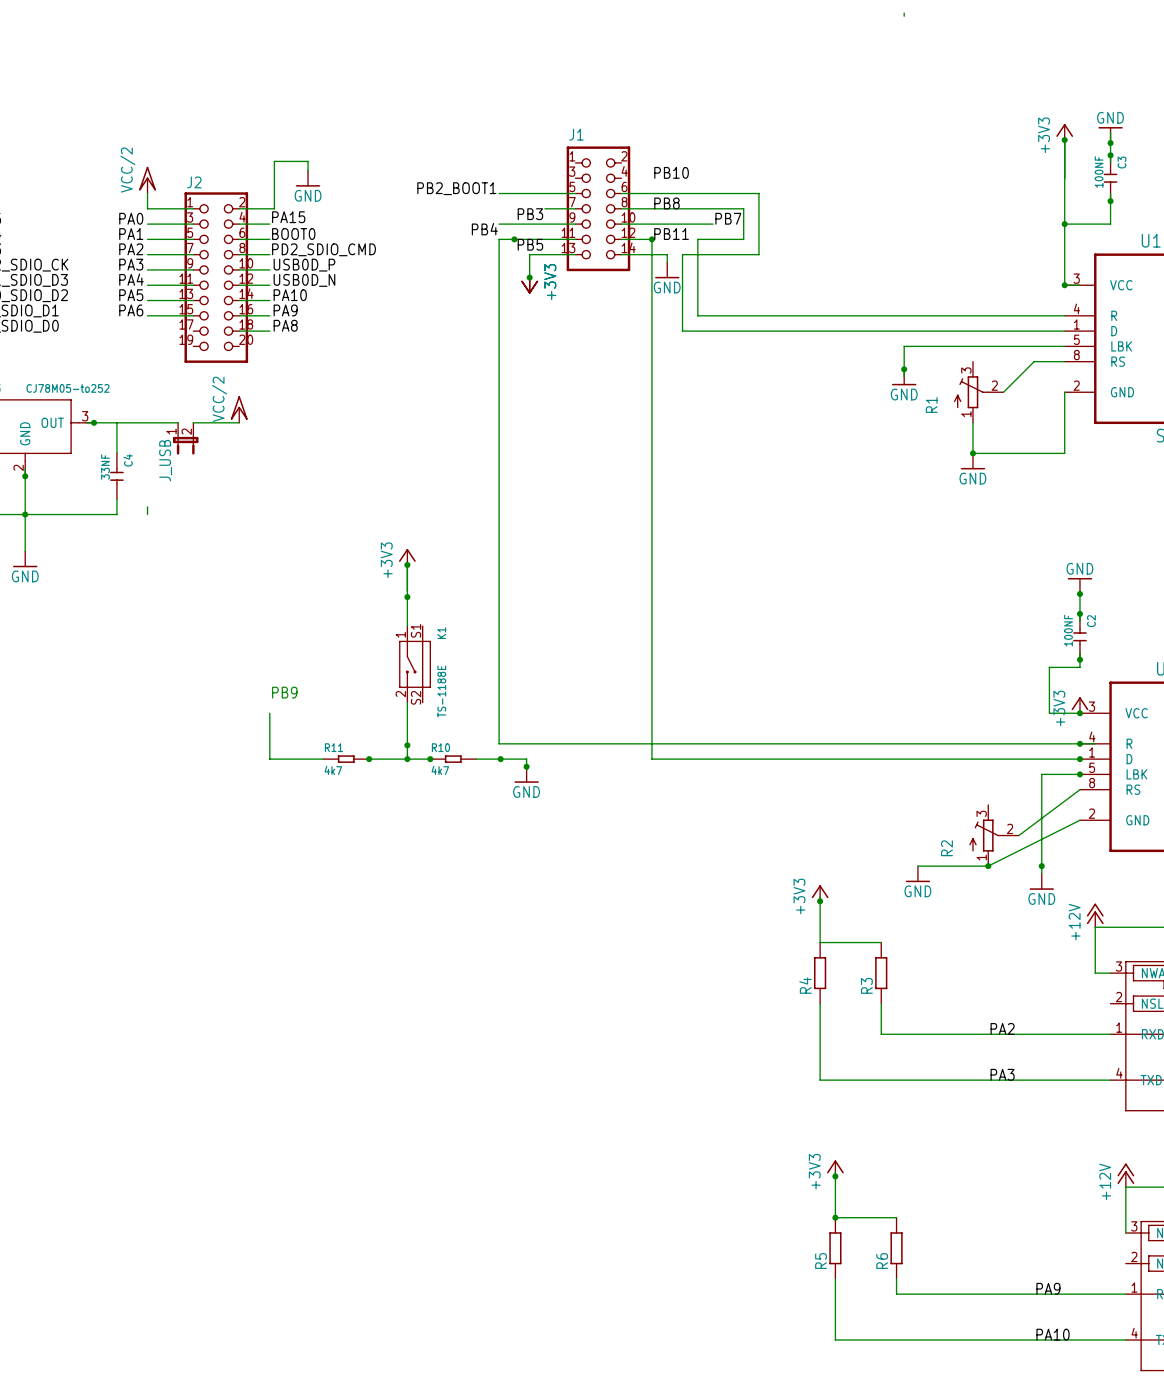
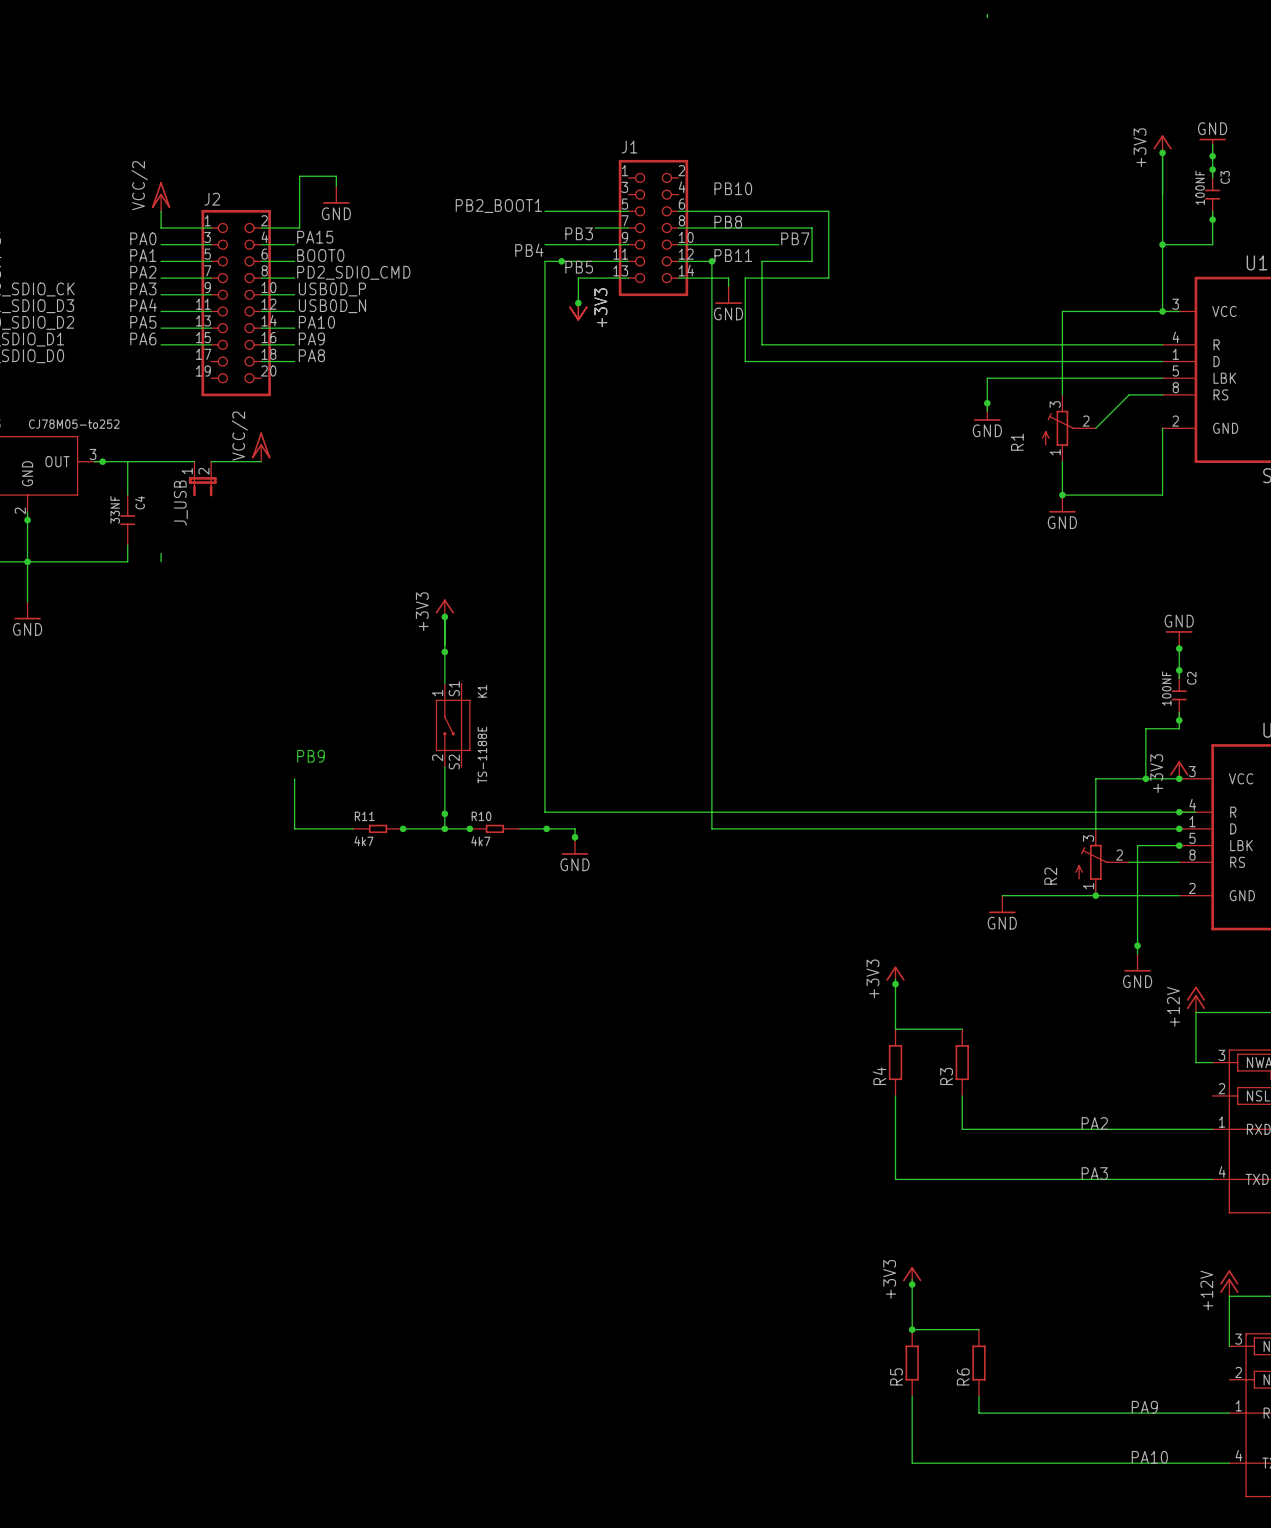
wire: none -> (1162, 311) (1062, 311) (1062, 394)
wire: none -> (1145, 778) (1095, 778) (1095, 828)
junction: none -> (1145, 778)
wire: (1079, 789) (1018, 835) -> (1179, 862) (1129, 862)
junction: none -> (1095, 895)
wire: (1079, 820) (988, 866) (917, 866) -> (1179, 895) (1002, 895)
R2 position: (994, 835) -> (1102, 862)
junction: (988, 866) -> none
power symbol position: GND (917, 874) -> GND (1002, 904)

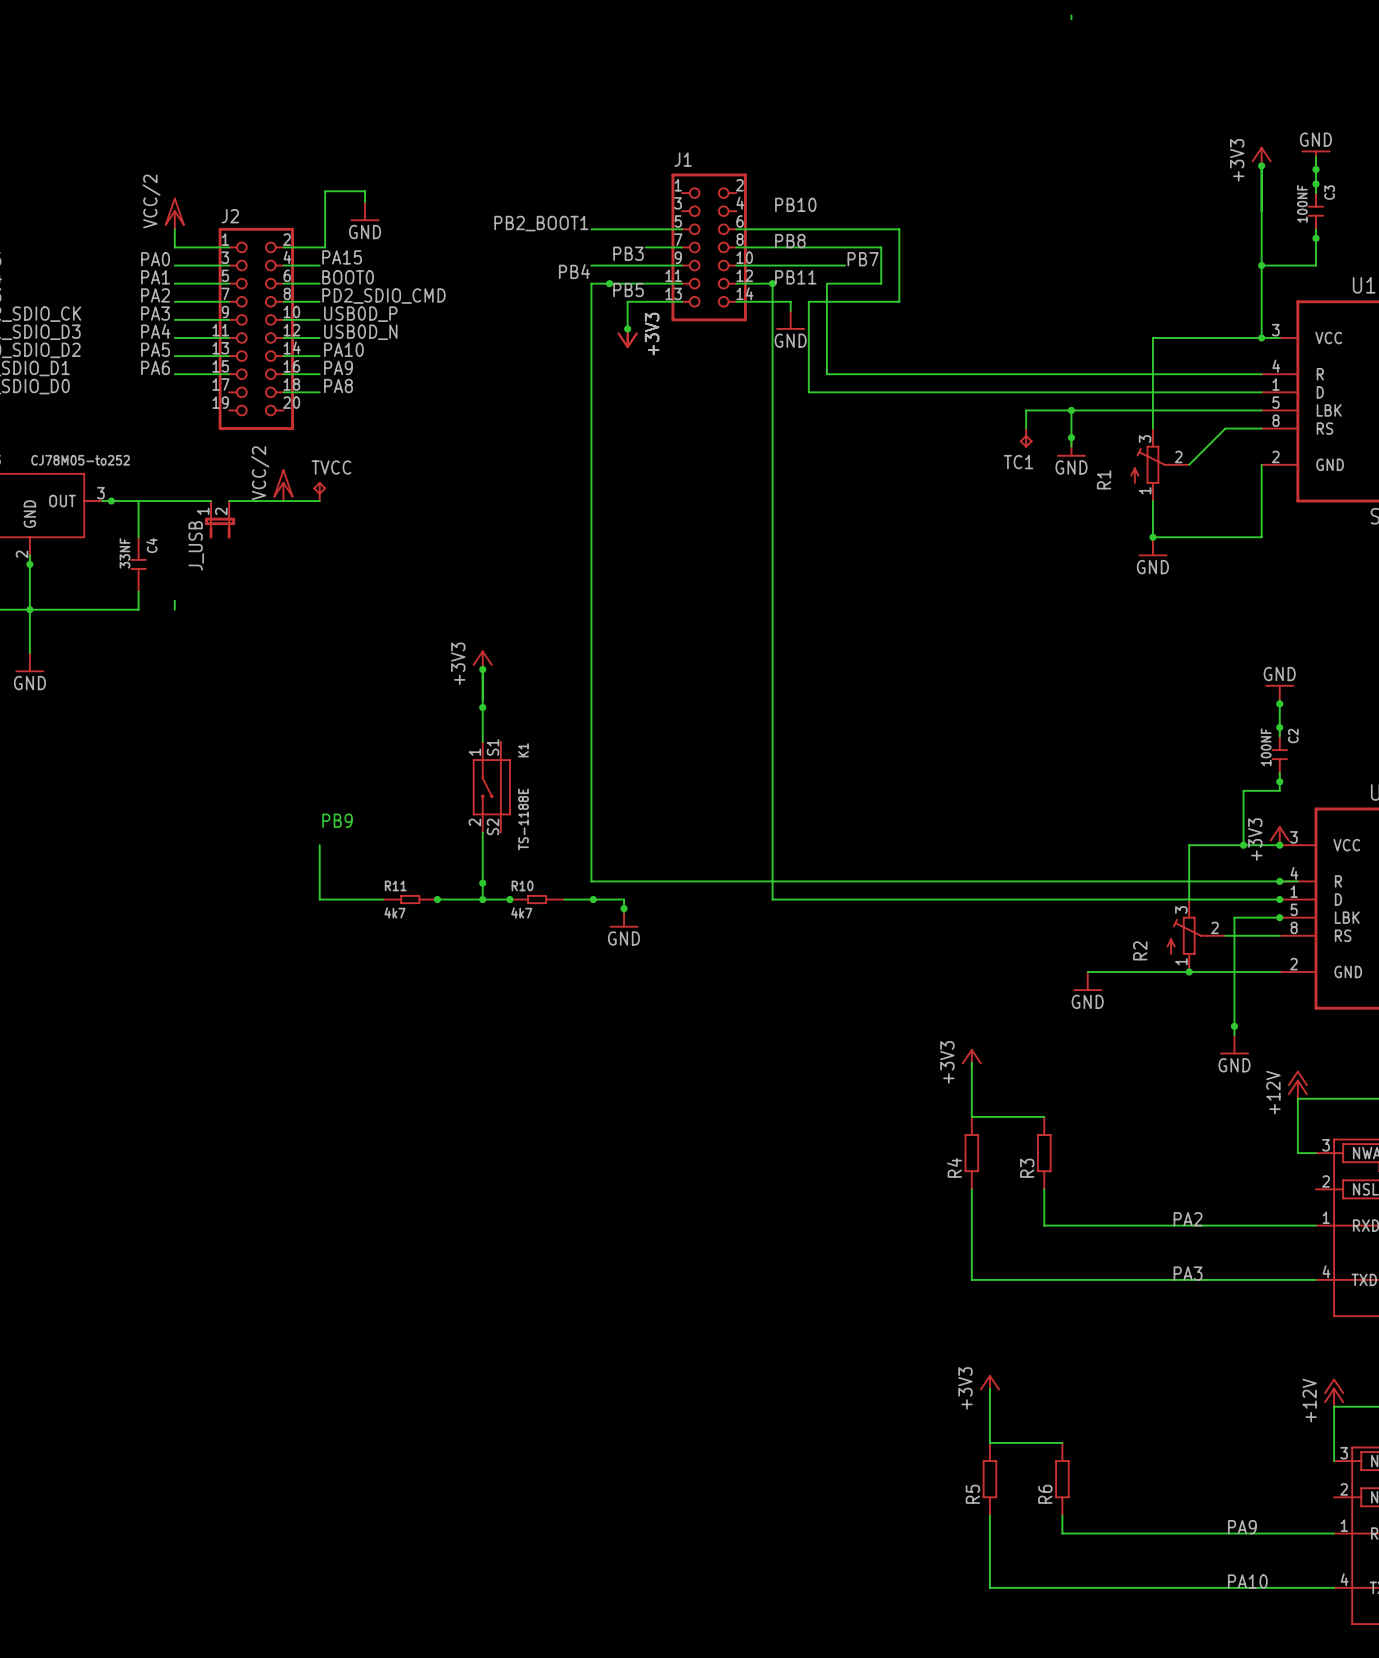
wire: none -> (1071, 410) (1026, 410) (1026, 428)
junction: none -> (1071, 410)
TC1: none -> (1026, 438)
TVCC: none -> (319, 491)
wire: none -> (283, 501) (319, 501)
junction: (895, 984) -> none
junction: (912, 1284) -> none
junction: (912, 1329) -> none

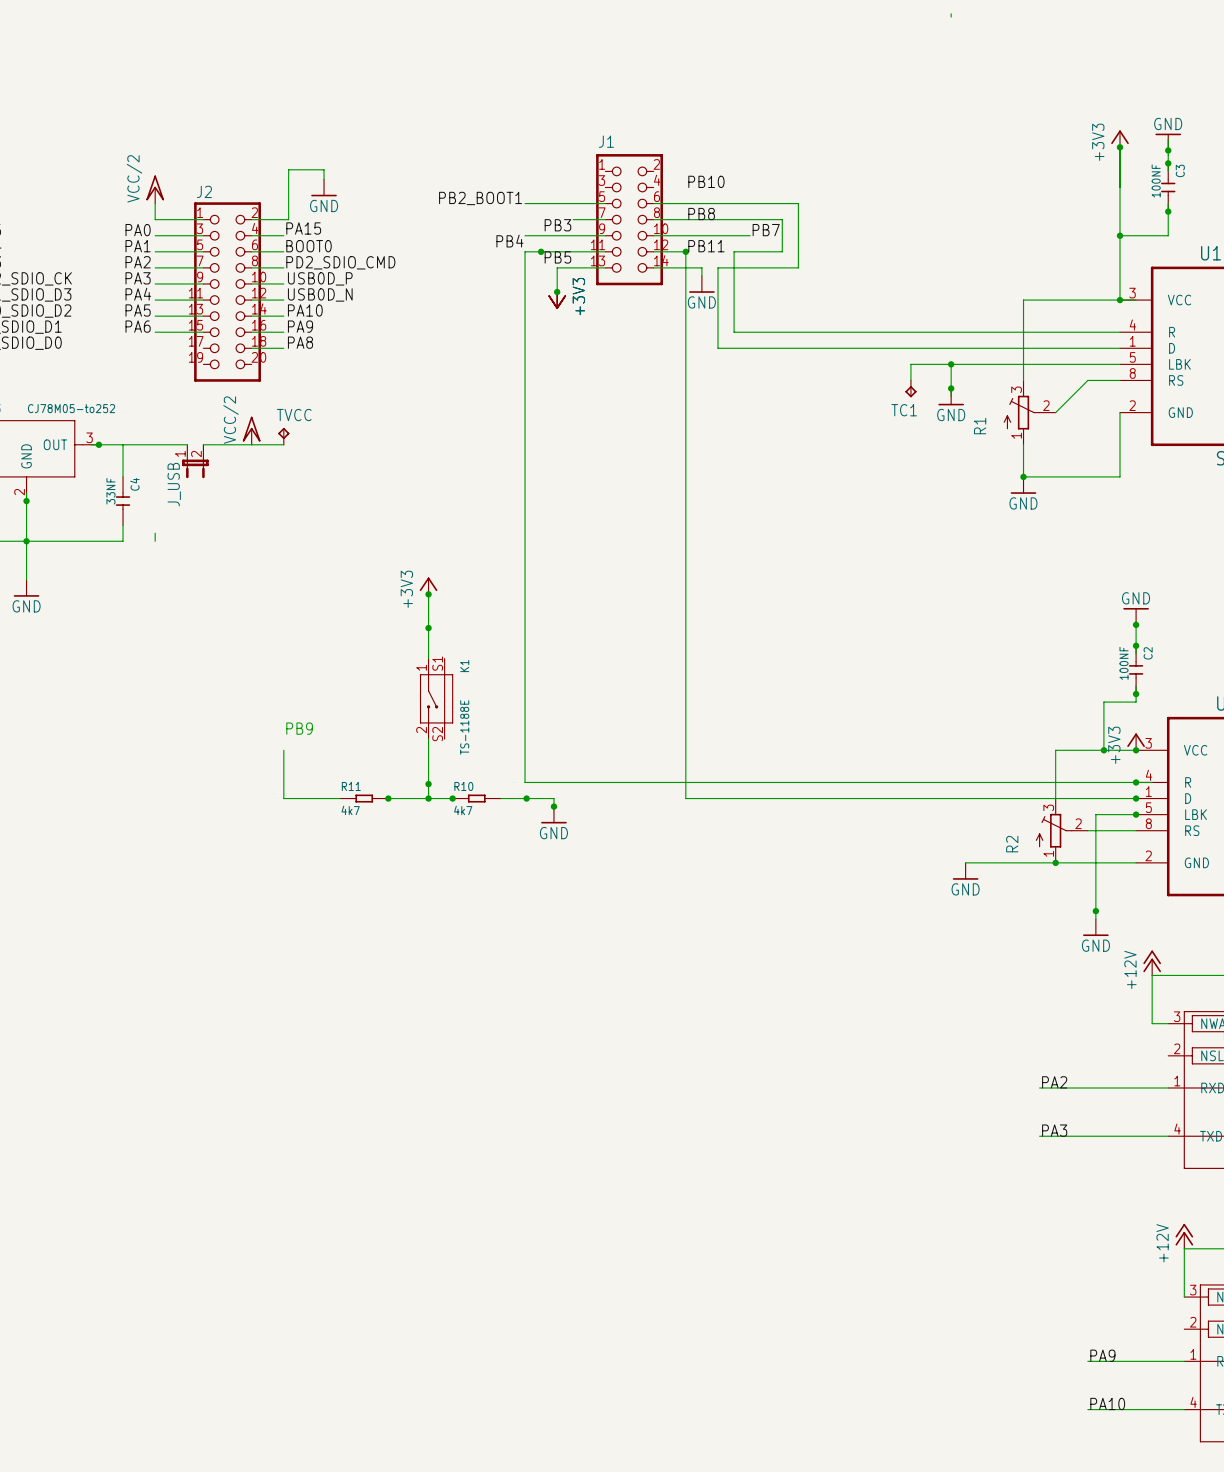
power symbol: +3V3 (971, 1058) -> none
wire: (971, 1062) (971, 1116) (1044, 1116) -> none
R4: (971, 1153) -> none
R3: (1044, 1153) -> none
wire: (971, 1189) (971, 1279) (1171, 1279) -> none
wire: (1044, 1189) (1044, 1225) (1171, 1225) -> none
power symbol: +3V3 (989, 1384) -> none
wire: (989, 1388) (989, 1442) (1062, 1442) -> none
R5: (989, 1479) -> none
R6: (1062, 1479) -> none
wire: (989, 1515) (989, 1587) (1225, 1587) -> none
wire: (1062, 1515) (1062, 1533) (1225, 1533) -> none

